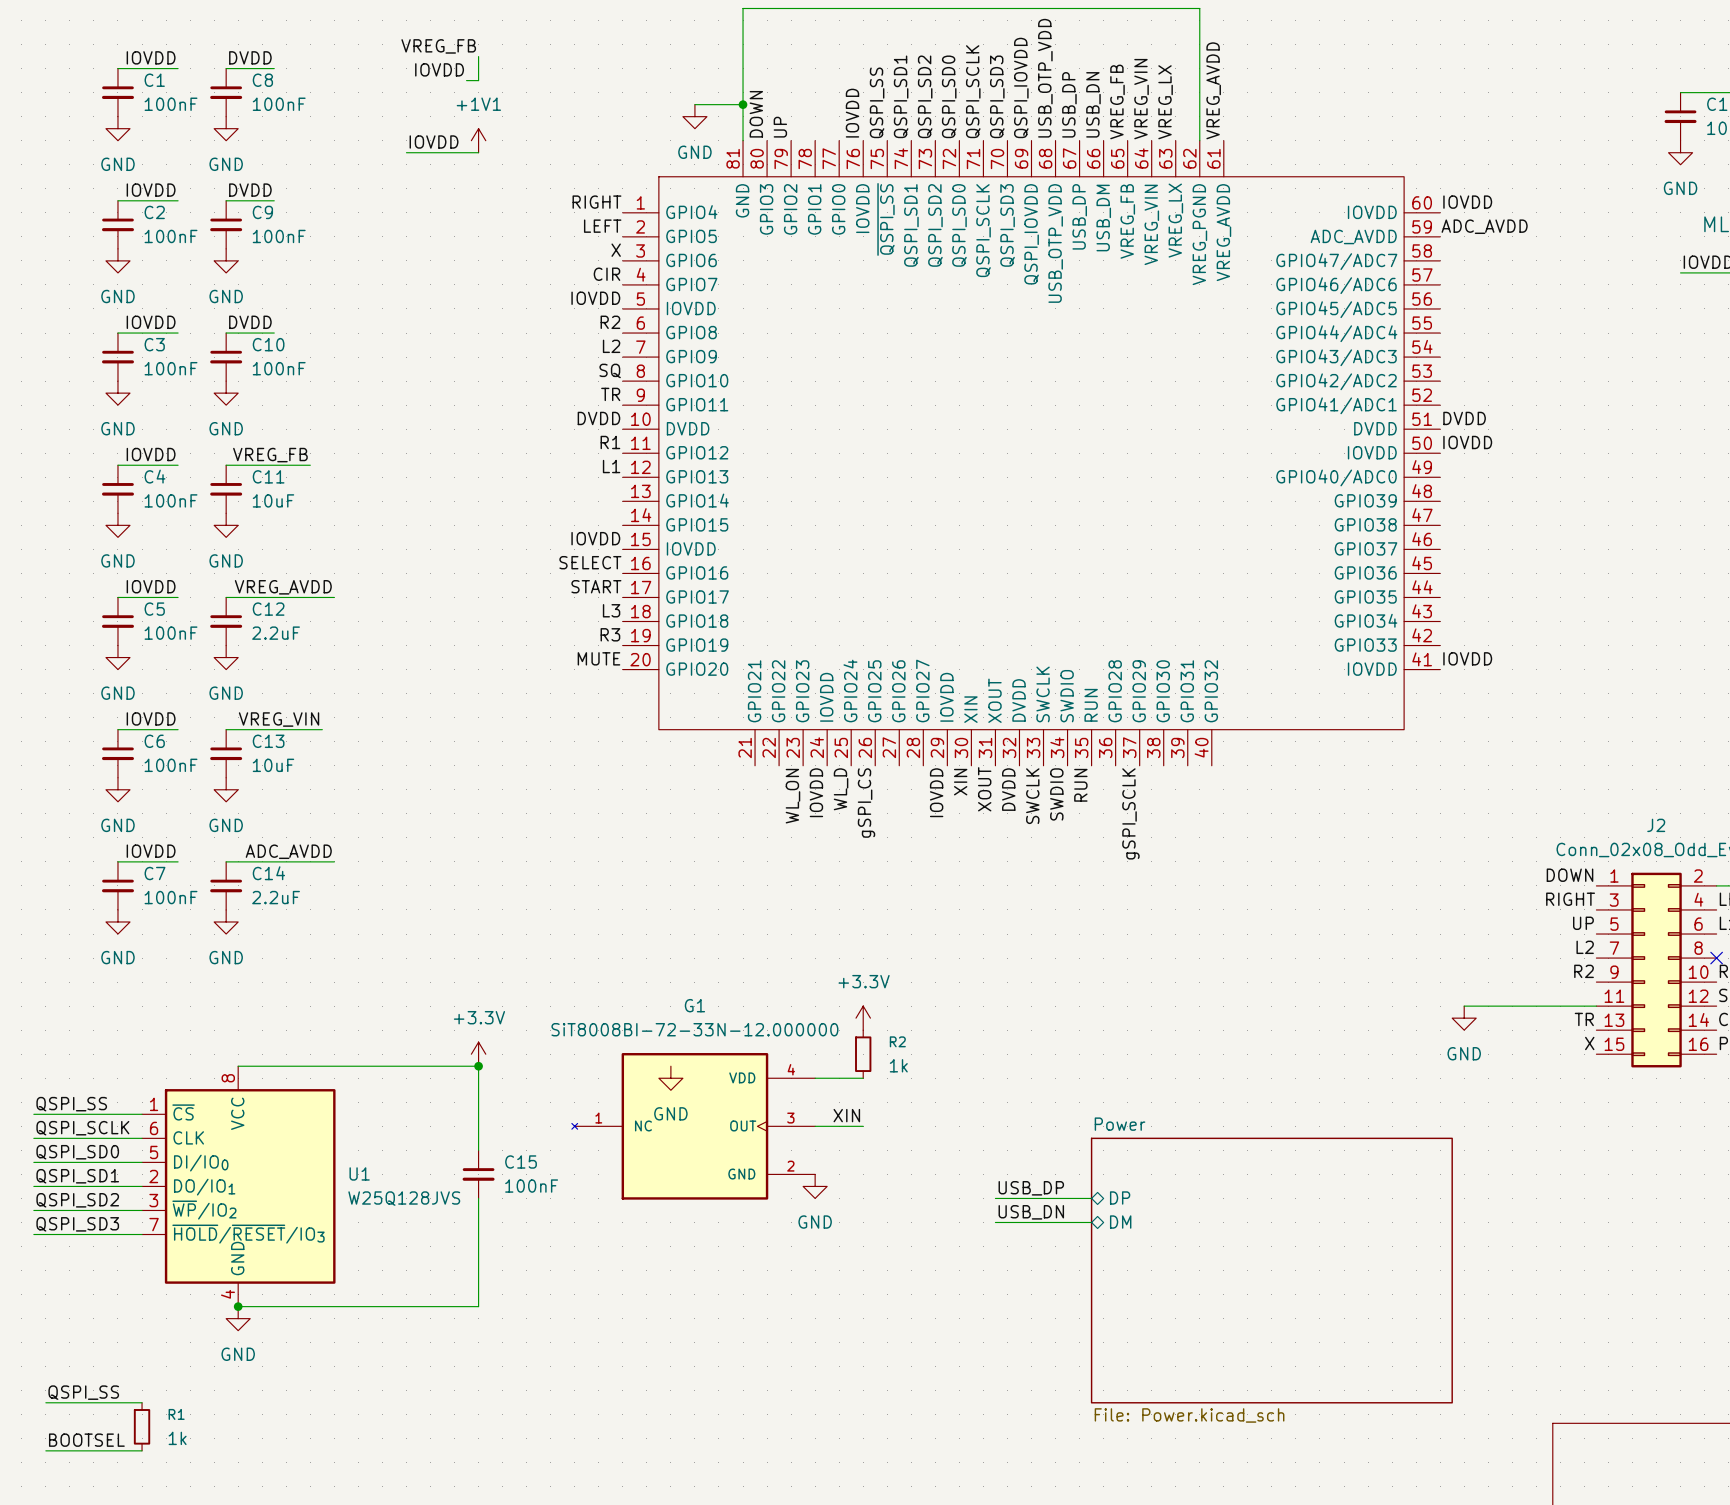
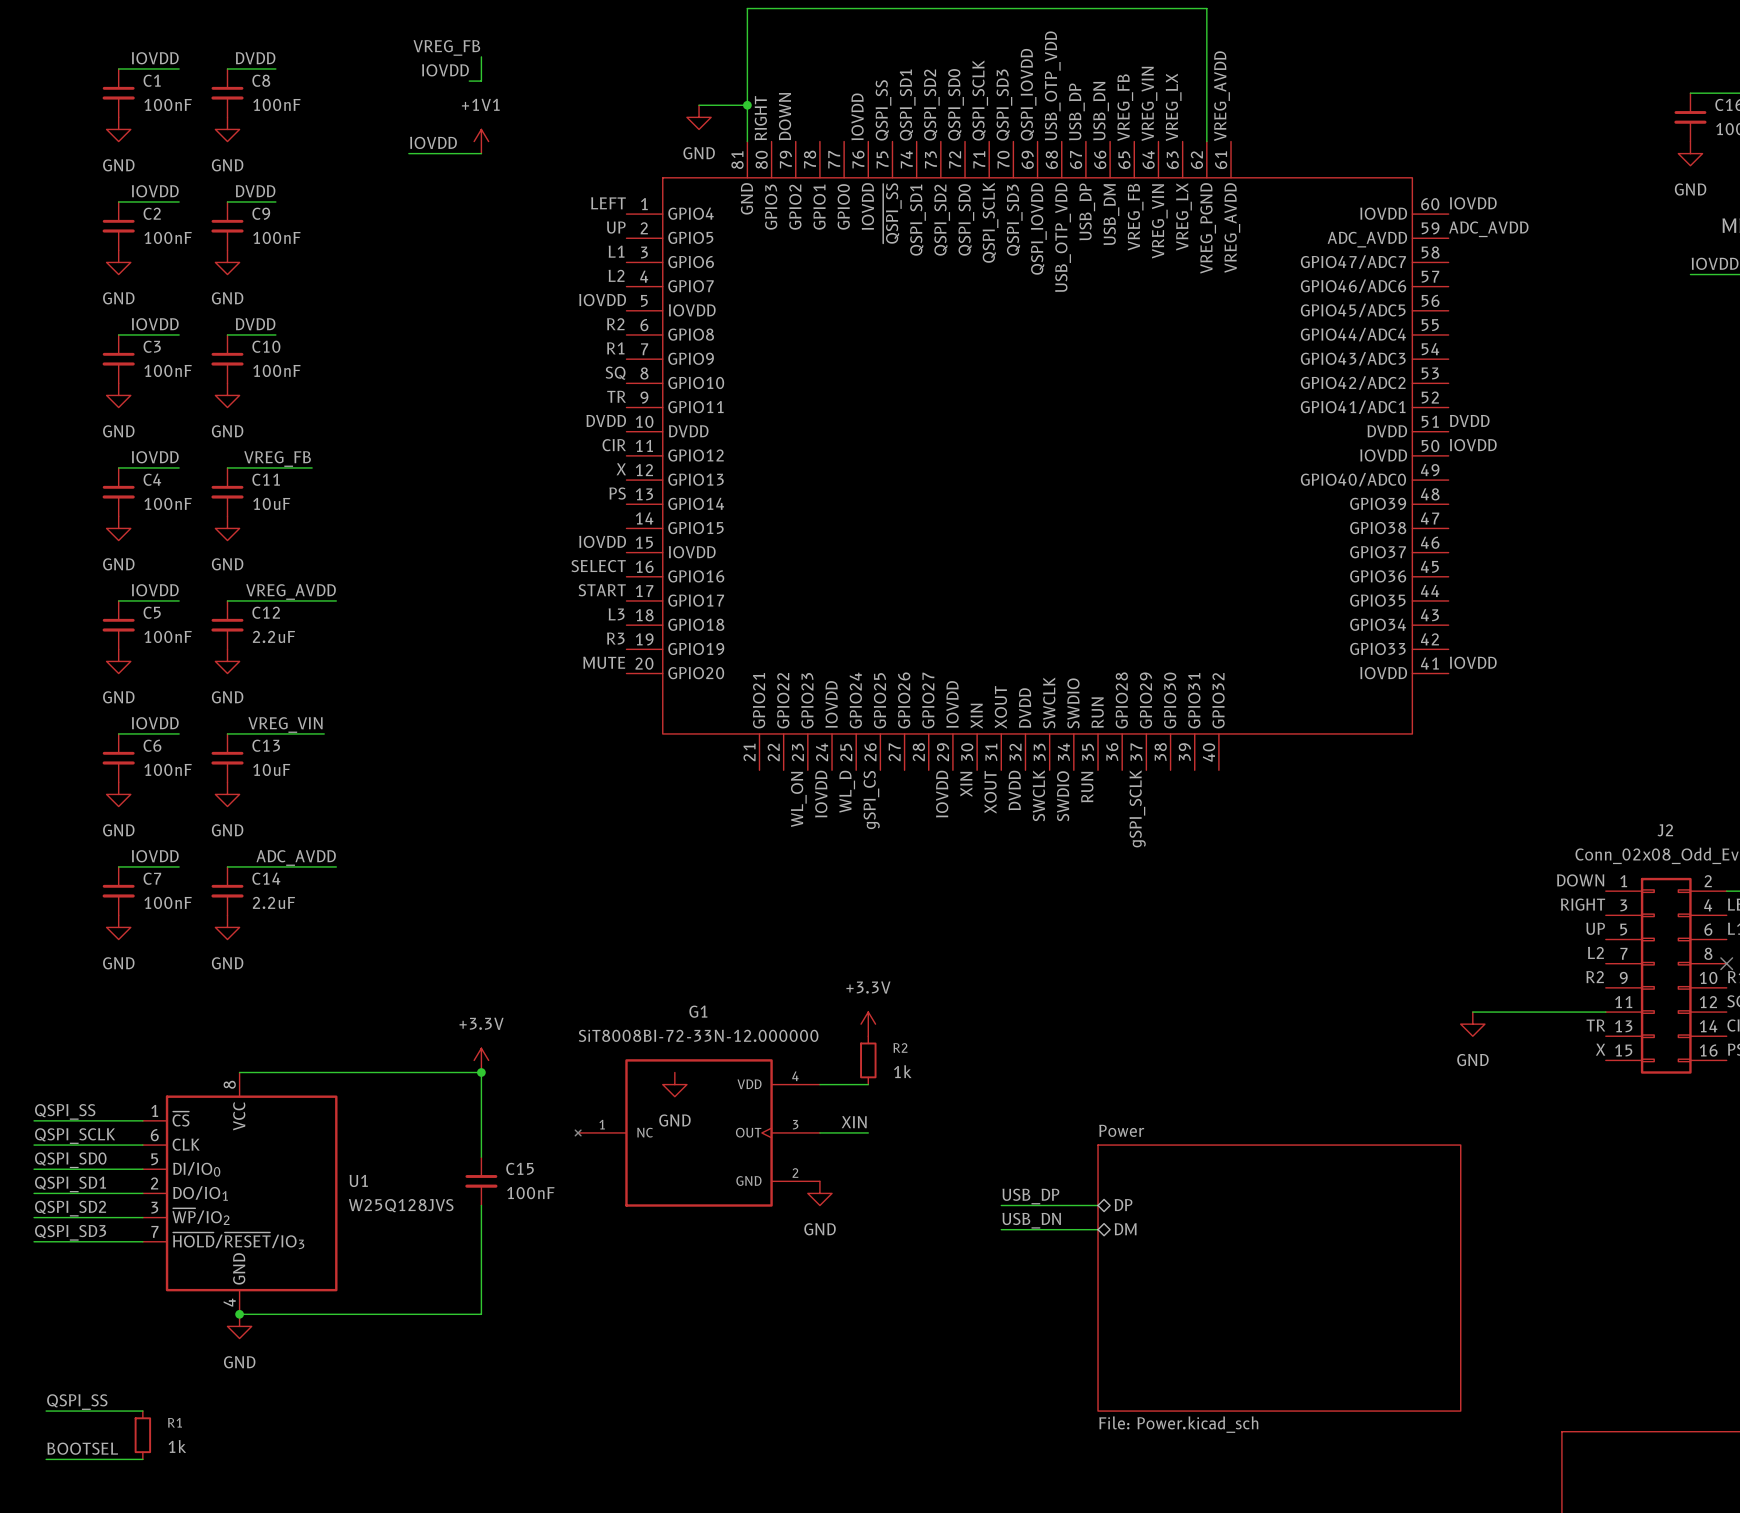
label: DOWN (756, 114) -> RIGHT (760, 118)
label: UP (780, 127) -> DOWN (785, 116)
label: RIGHT (596, 202) -> LEFT (608, 203)
label: LEFT (602, 226) -> UP (616, 227)
label: X (616, 250) -> L1 (616, 251)
label: CIR (606, 274) -> L2 (616, 275)
label: L2 (611, 346) -> R1 (615, 348)
label: R1 (610, 442) -> CIR (614, 445)
label: L1 (611, 466) -> X (621, 469)
label: none -> PS (617, 493)

